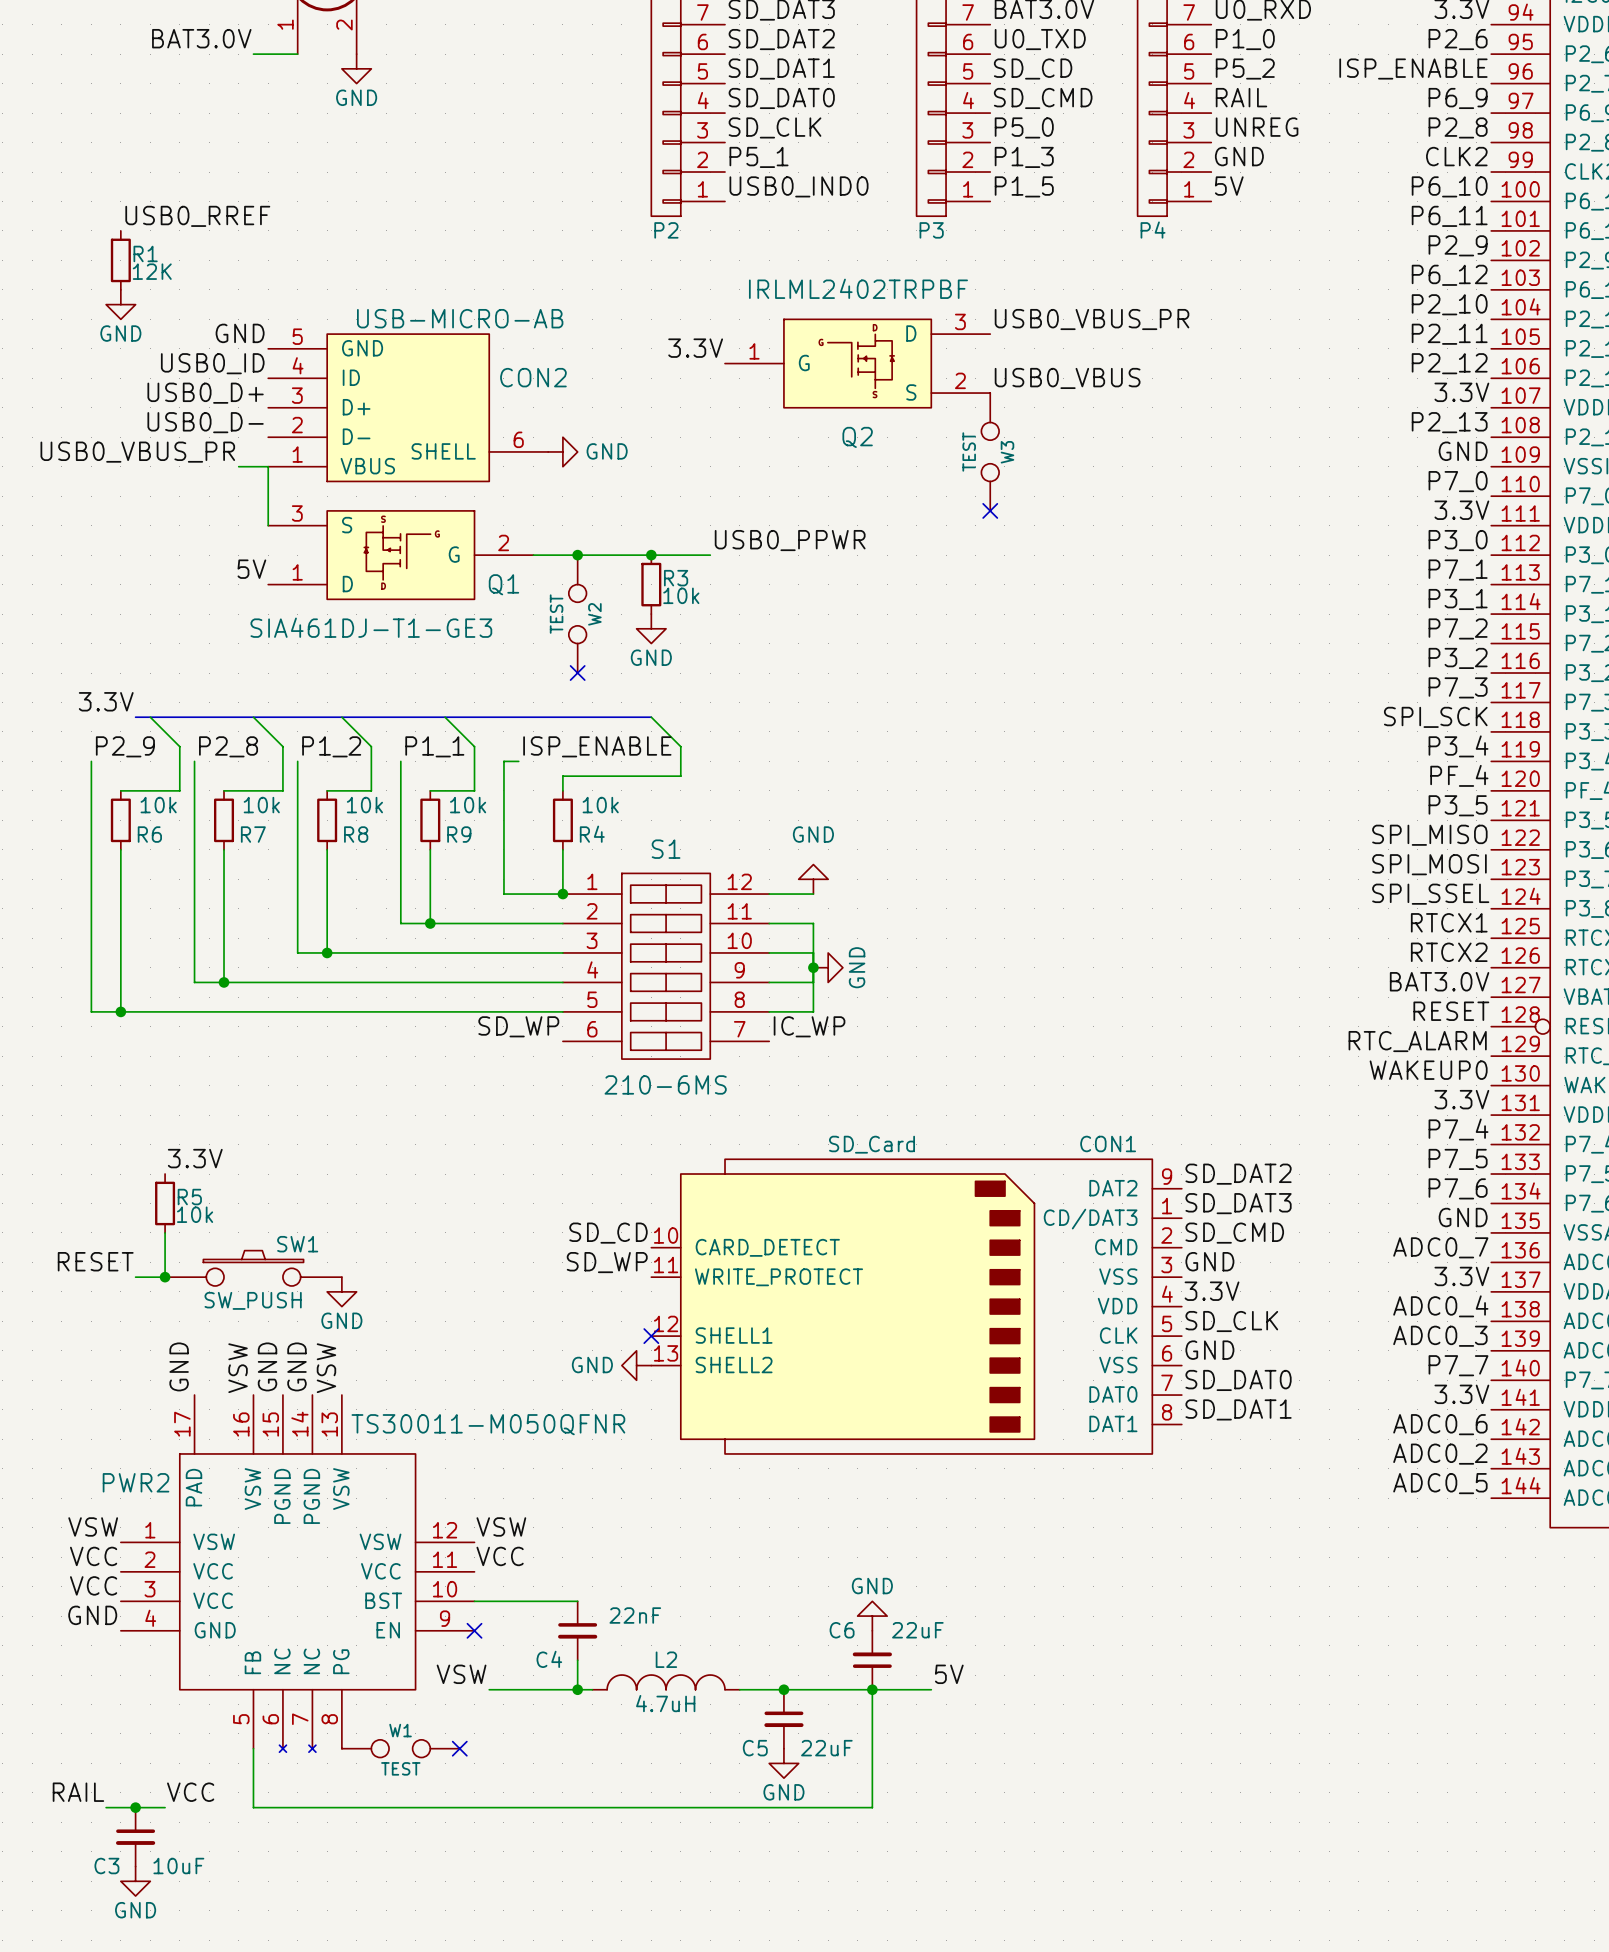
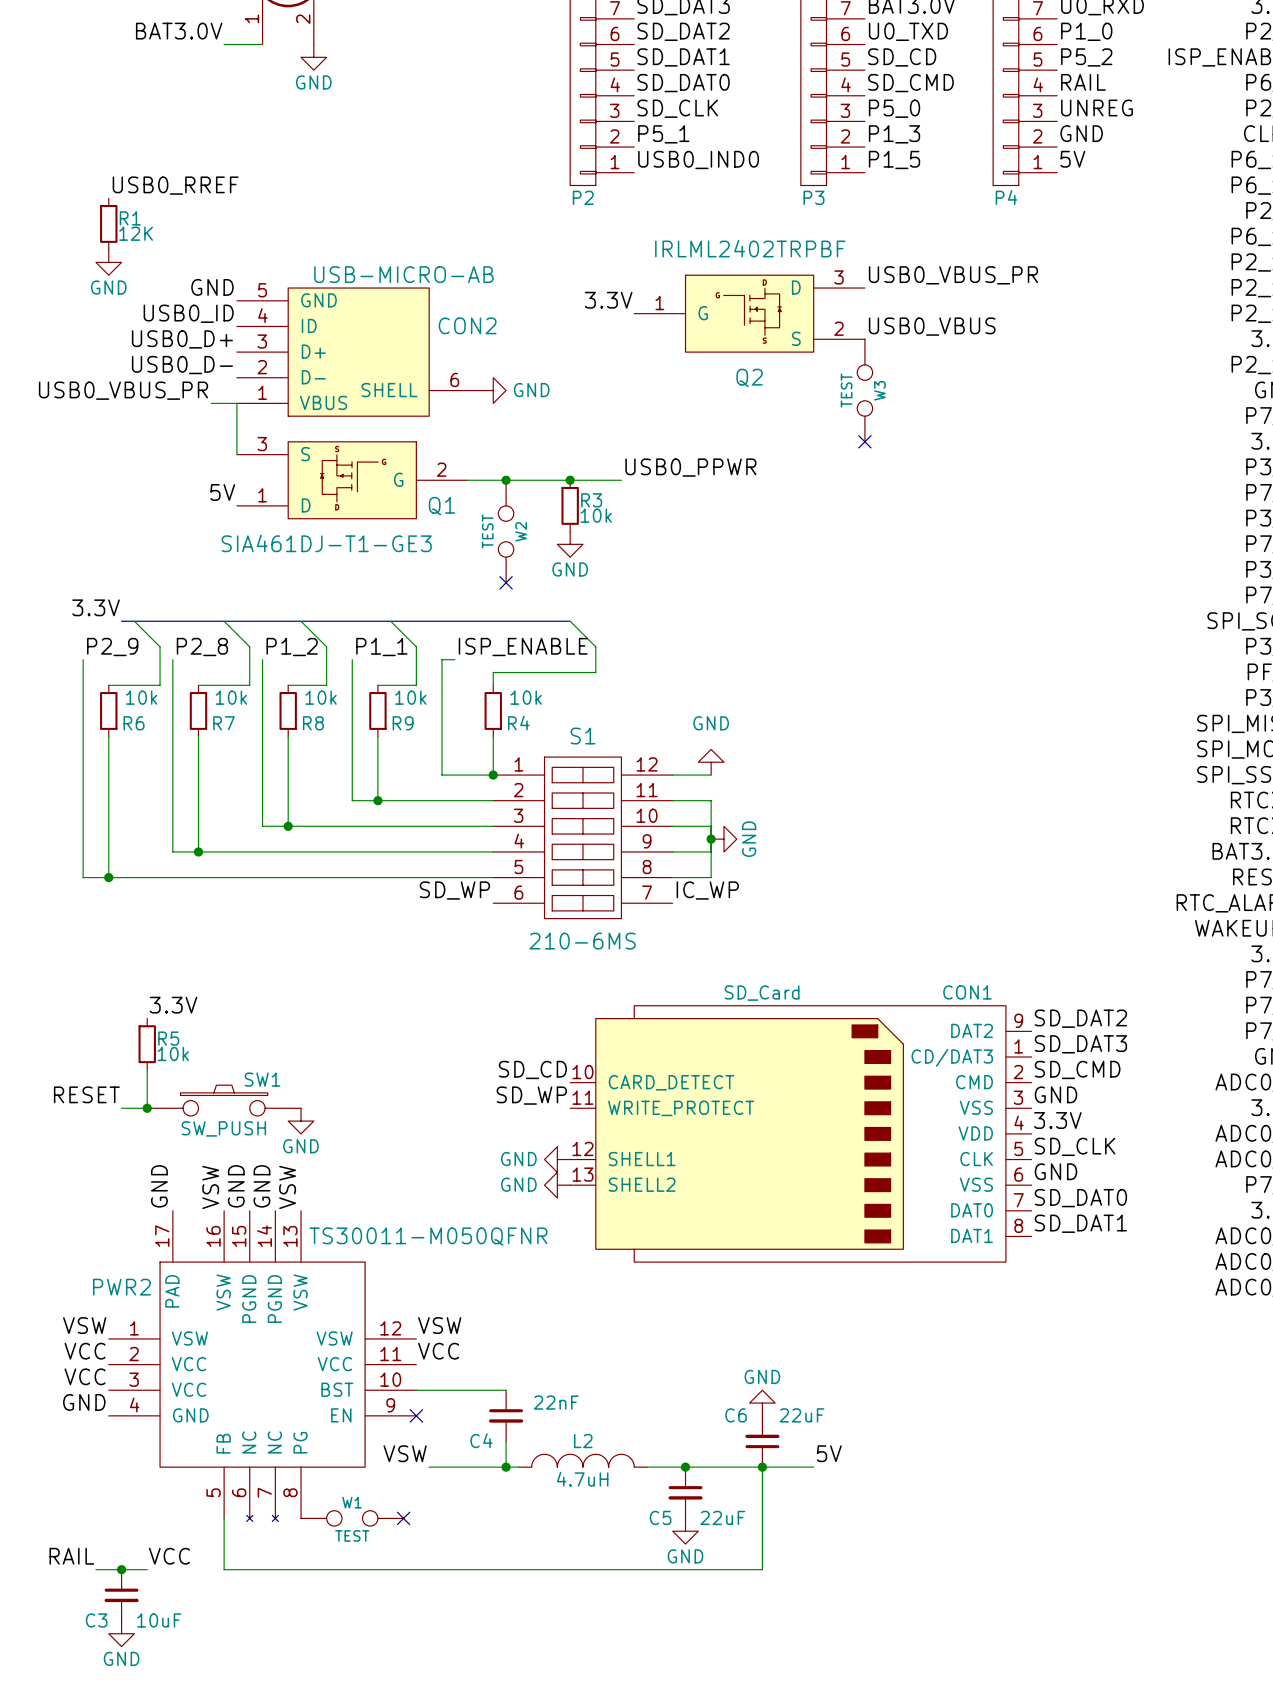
power symbol: none -> GND (557, 1159)
no-connect mark: (651, 1336) -> none

